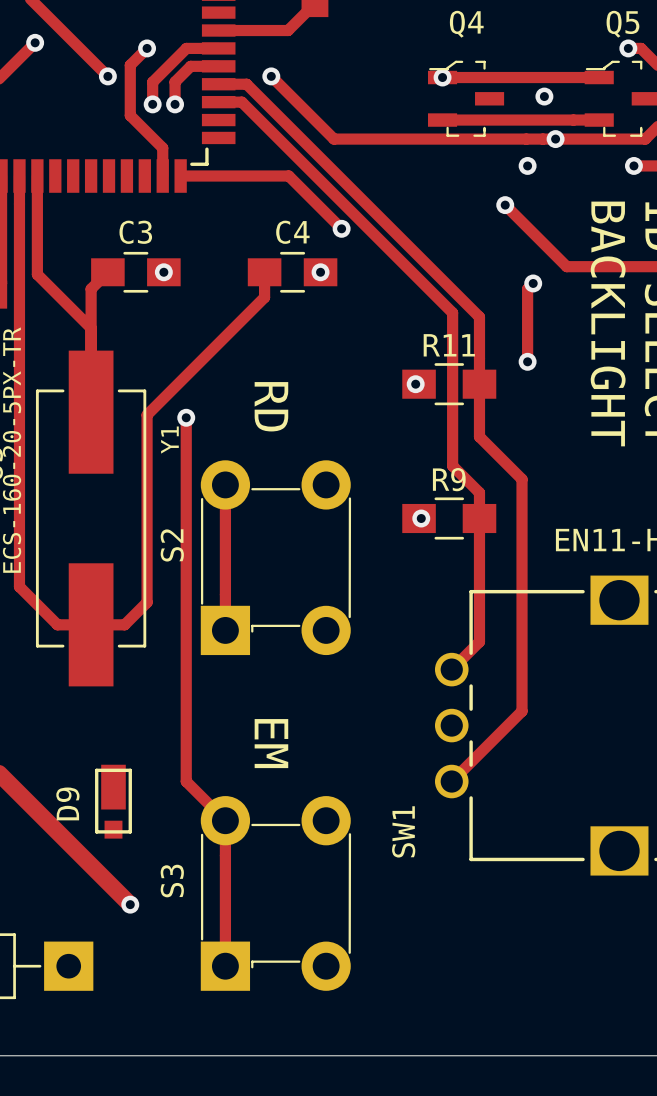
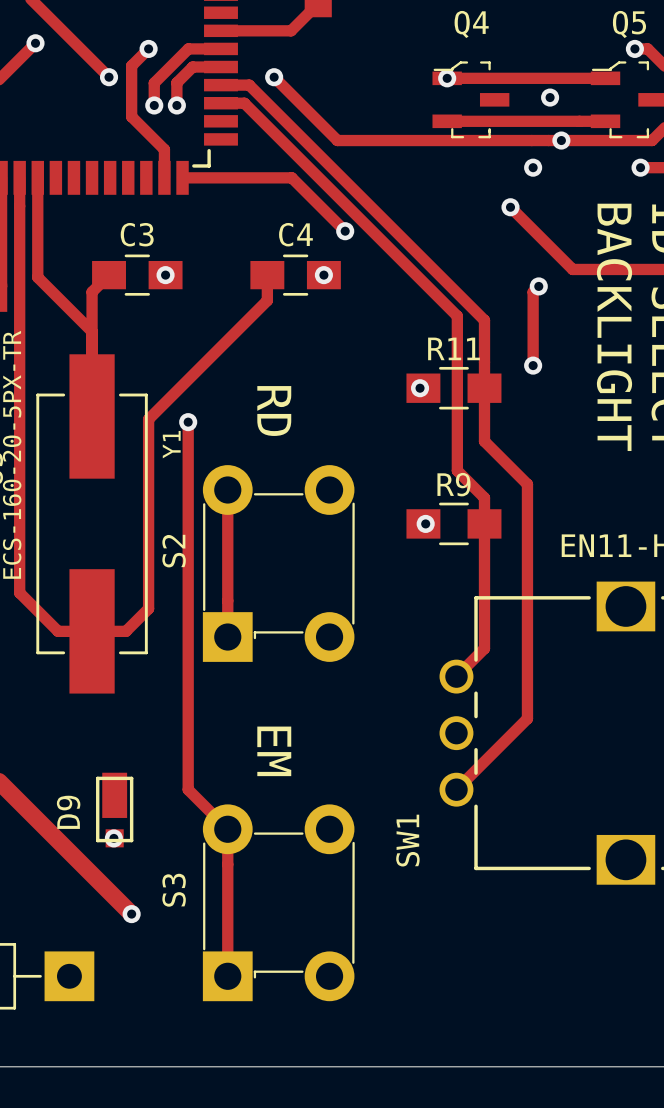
via: none -> (113, 838)

